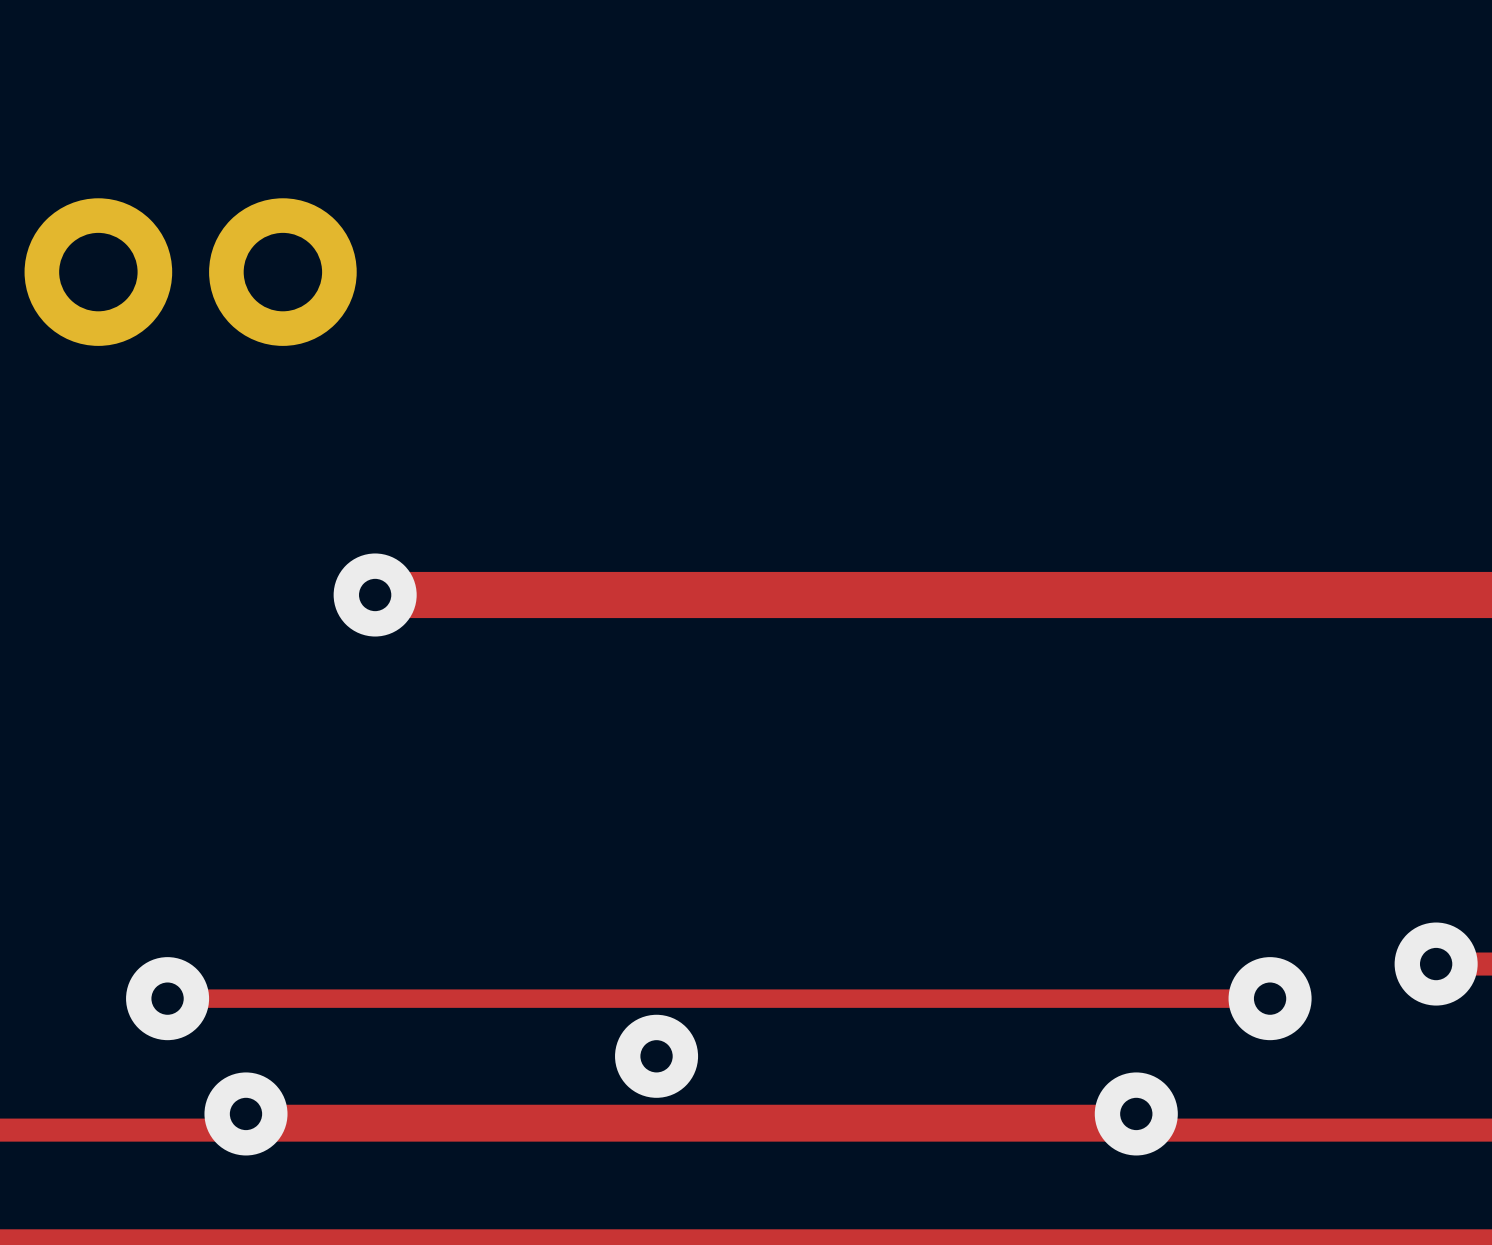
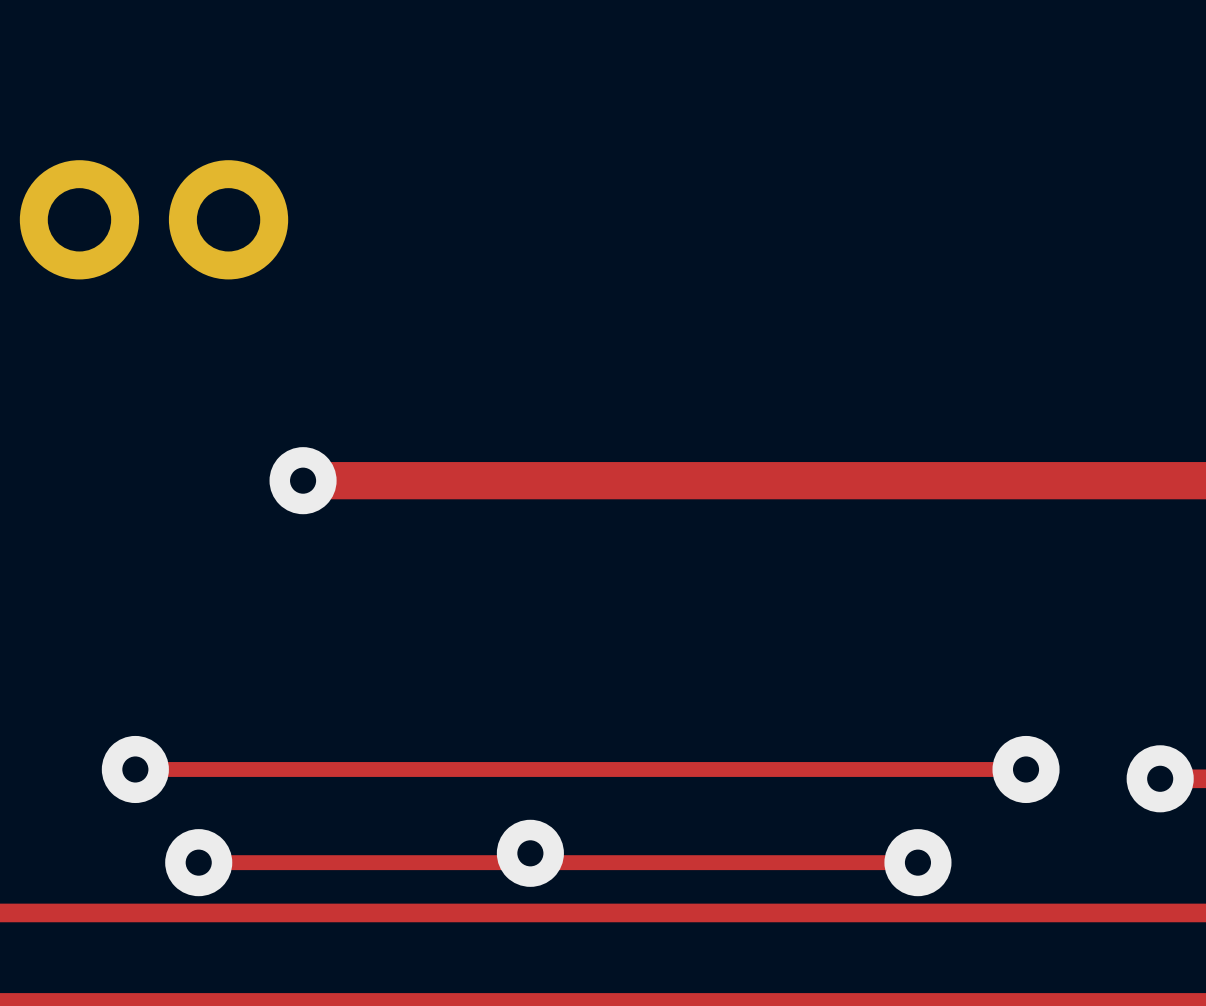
track: (167, 998) (1270, 998) -> (135, 769) (1026, 769)
via position: (167, 998) -> (135, 769)
via position: (1270, 998) -> (1026, 769)
track: (245, 1113) (1136, 1113) -> (198, 862) (917, 862)
via position: (245, 1113) -> (198, 862)
via position: (1136, 1113) -> (917, 862)

